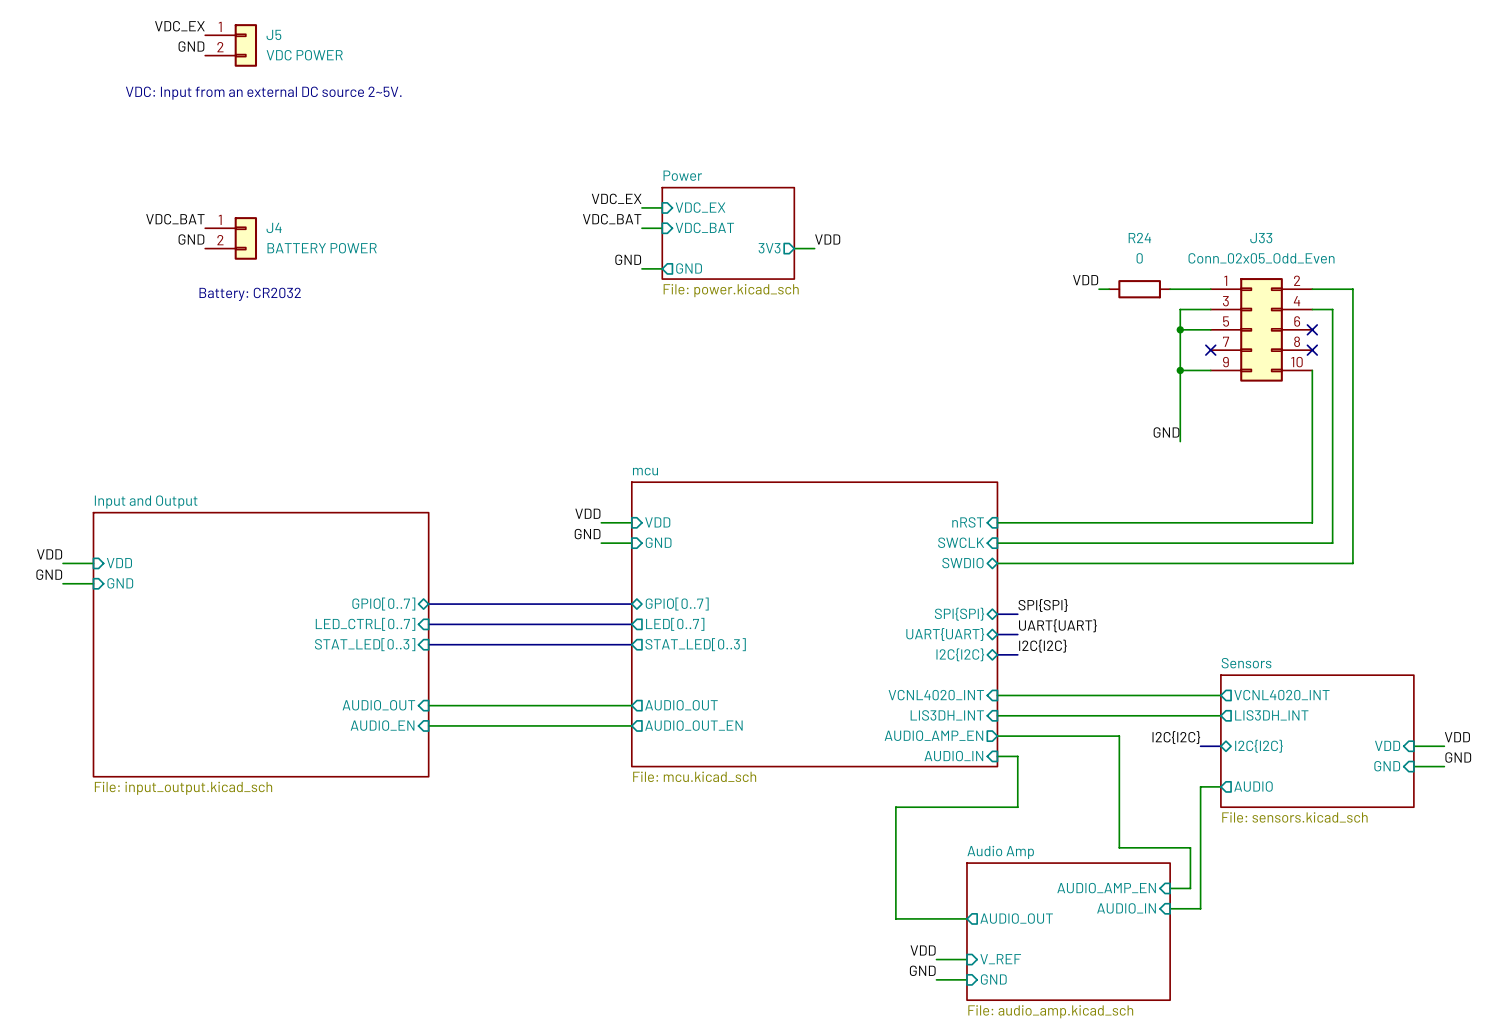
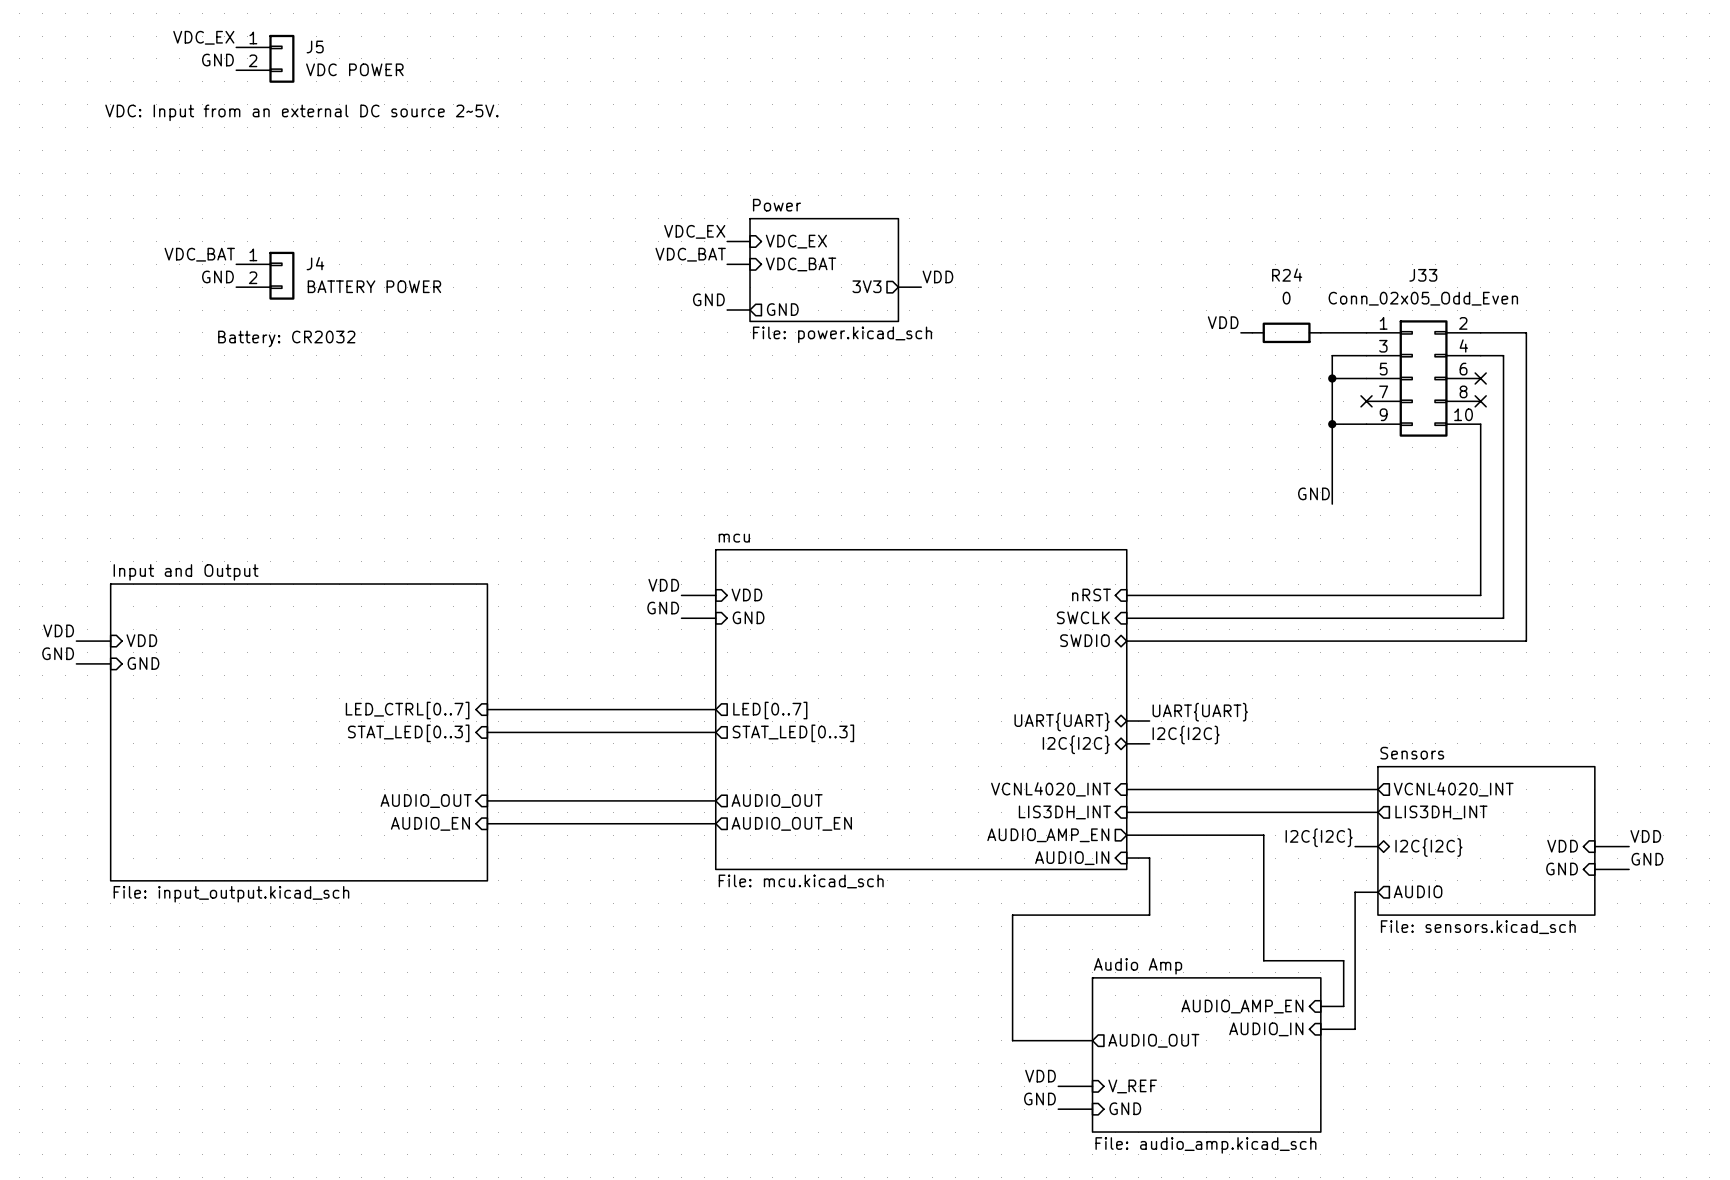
sheet pin: GPIO[0..7] (383, 604) -> none
bus: (428, 604) (631, 604) -> none
sheet pin: GPIO[0..7] (677, 604) -> none
label: SPI{SPI} (1043, 605) -> none
sheet pin: SPI{SPI} (959, 614) -> none
bus: (997, 614) (1017, 614) -> none

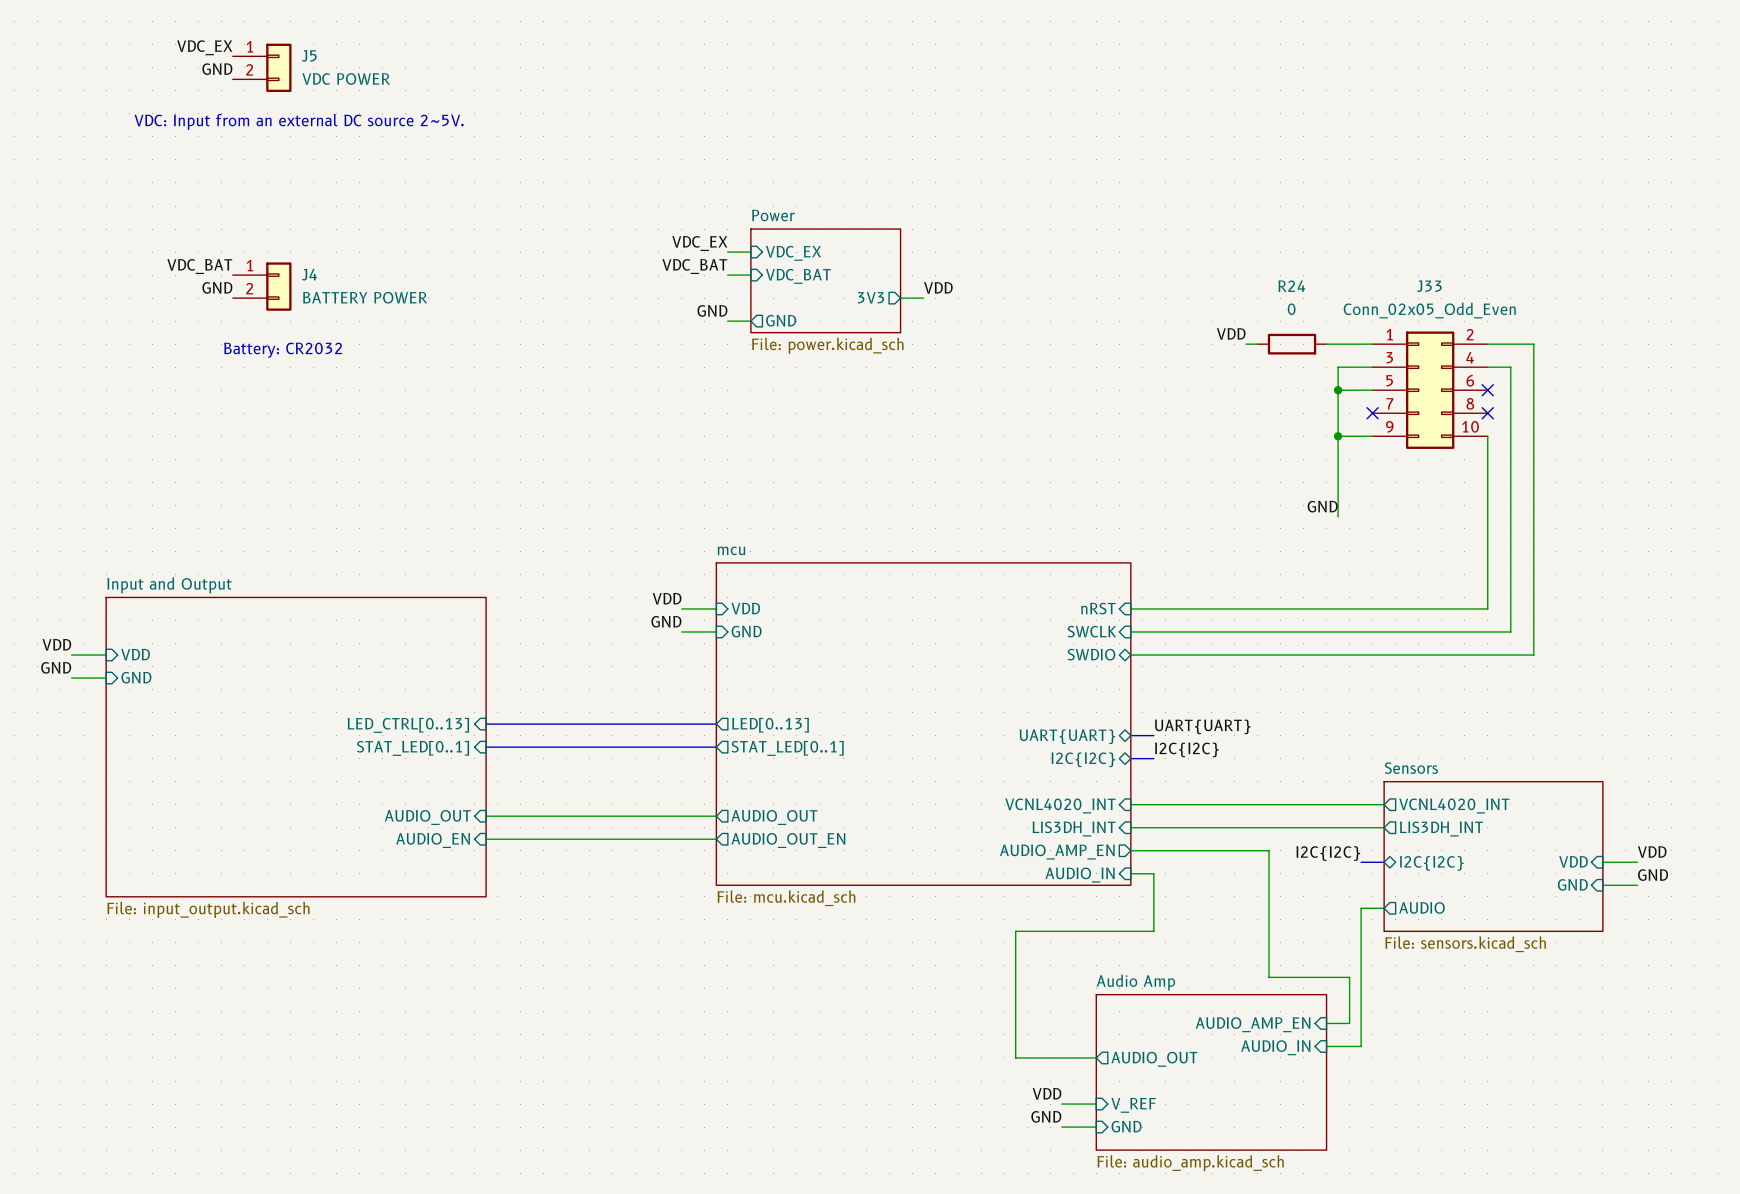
sheet pin: LED_CTRL[0..7] (407, 710) -> LED_CTRL[0..13] (408, 725)
sheet pin: LED[0..7] (770, 710) -> LED[0..13] (770, 725)
sheet pin: STAT_LED[0..3] (408, 733) -> STAT_LED[0..1] (413, 748)
sheet pin: STAT_LED[0..3] (793, 733) -> STAT_LED[0..1] (787, 748)

